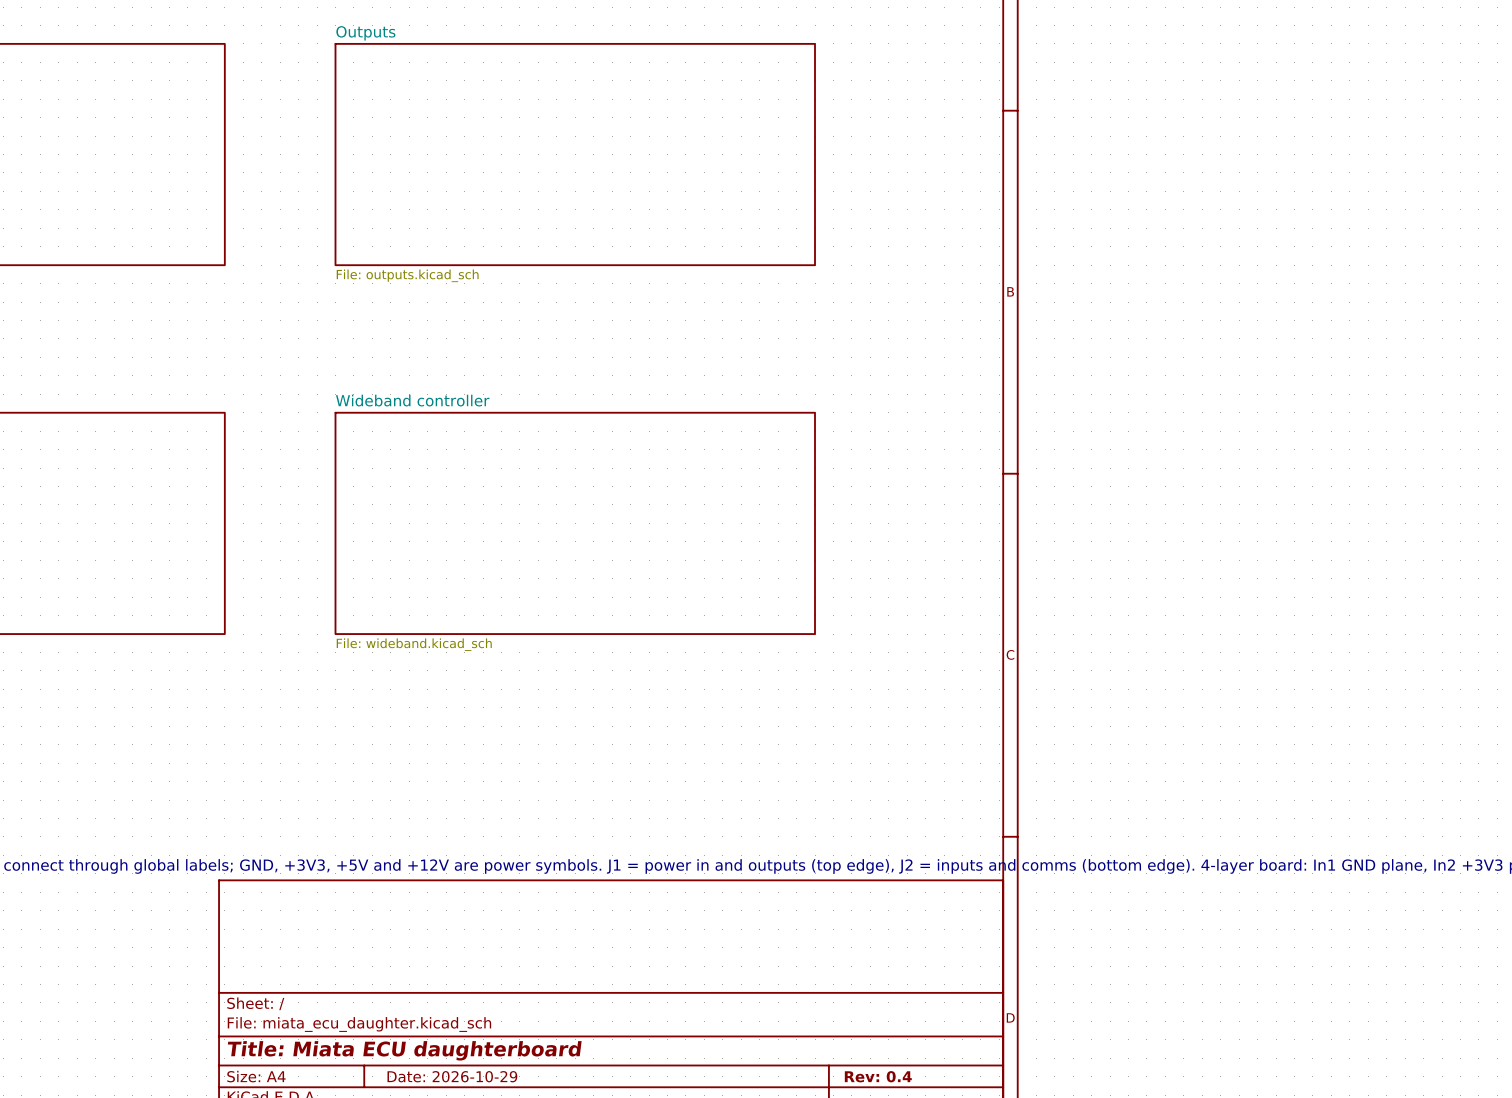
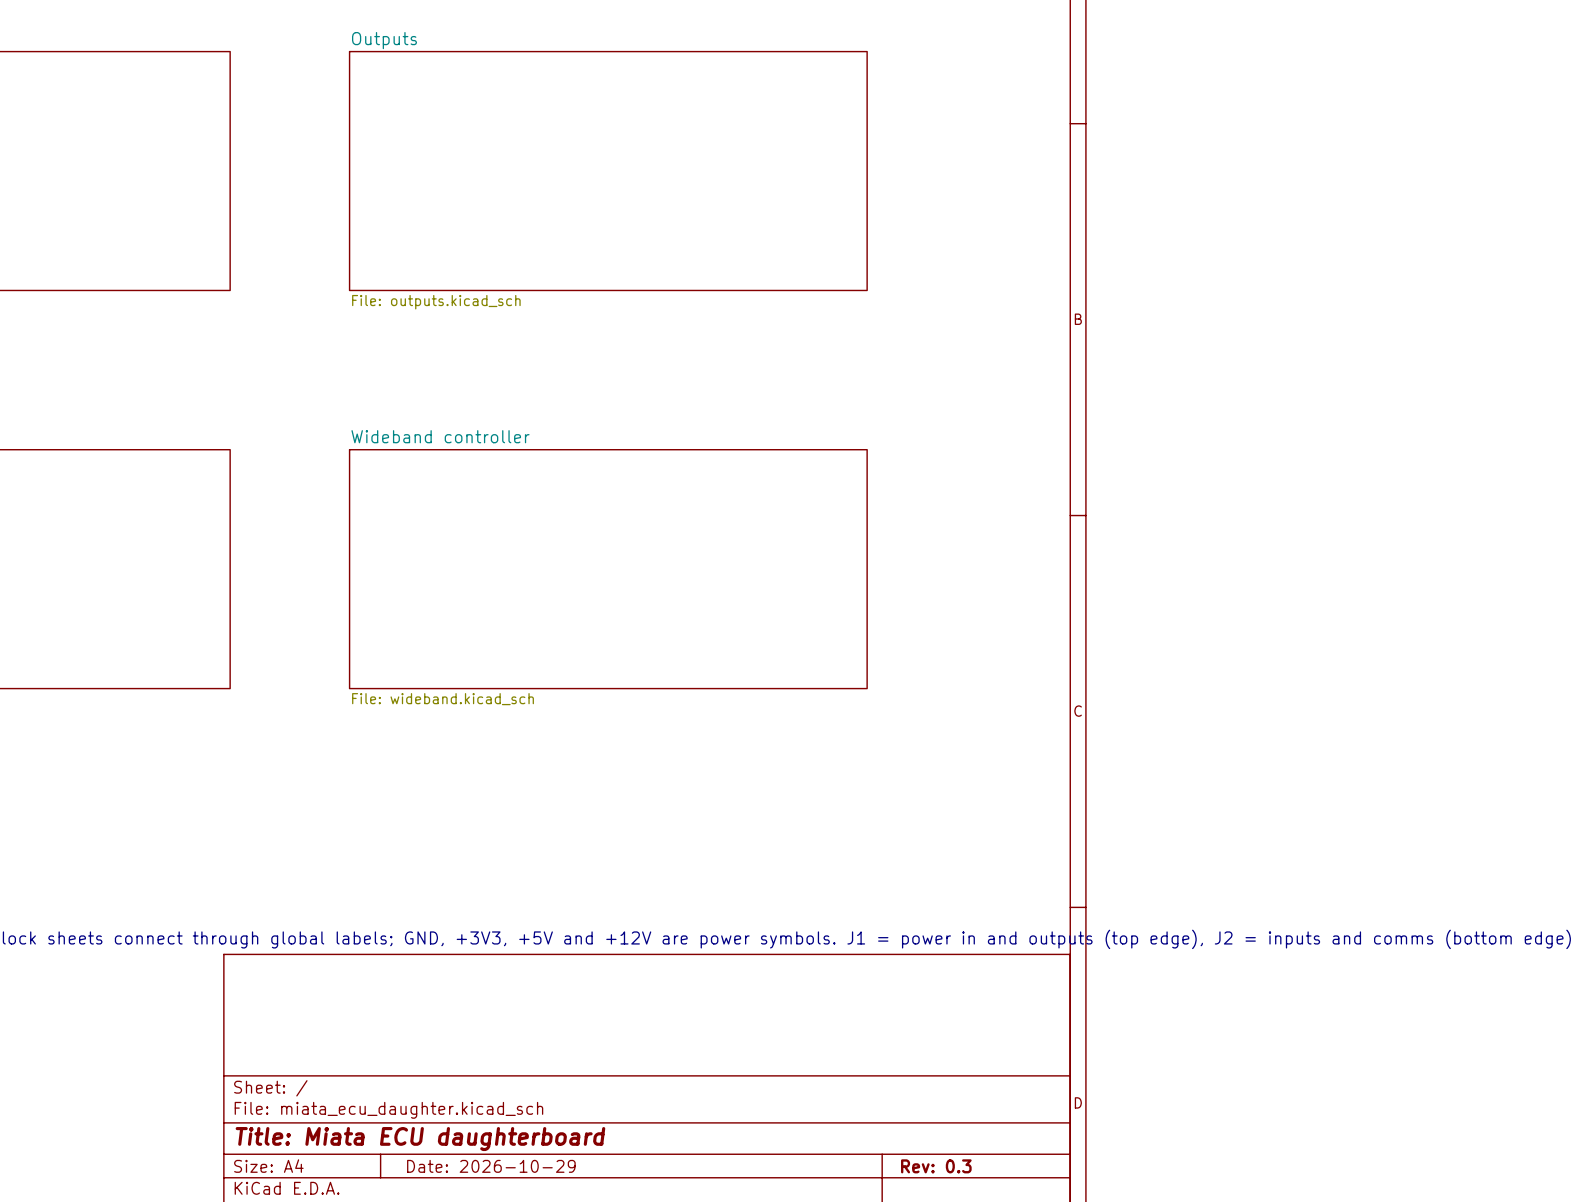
title block: Rev: 0.4 (878, 1076) -> Rev: 0.3 (936, 1166)

